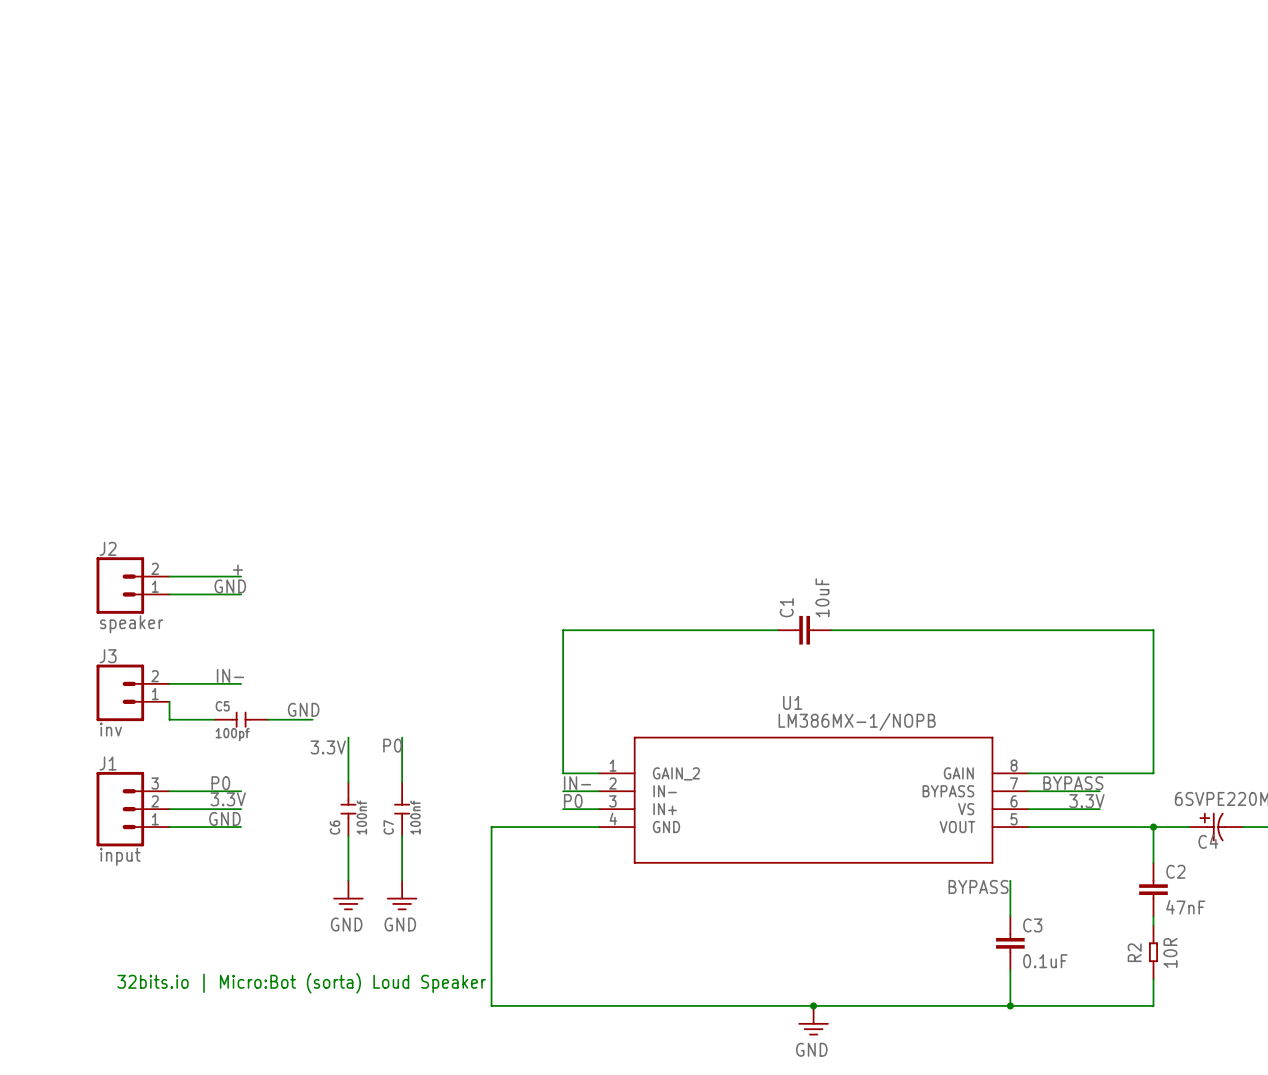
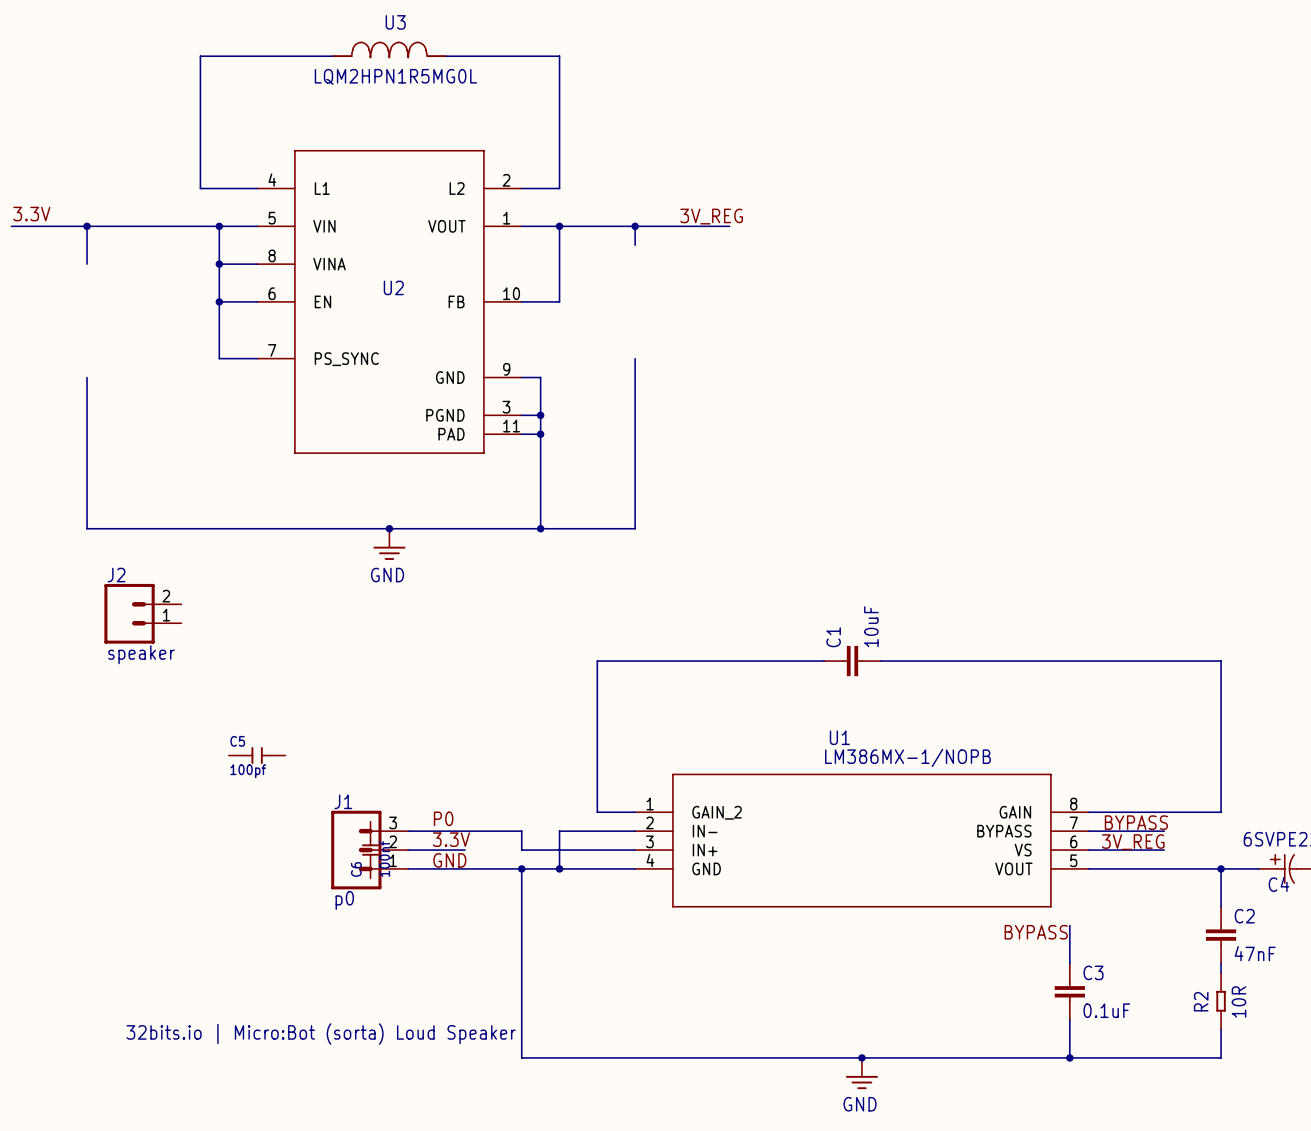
U3: none -> LQM2HPN1R5MG0L (389, 49)
wire: none -> (332, 56) (200, 56) (200, 188) (257, 188)
wire: none -> (446, 56) (559, 56) (559, 188) (521, 188)
label: none -> 3.3V (31, 214)
label: none -> 3V_REG (711, 216)
wire: none -> (11, 226) (257, 226)
wire: none -> (87, 226) (87, 264)
junction: none -> (87, 226)
wire: none -> (219, 226) (219, 358) (257, 358)
junction: none -> (219, 226)
wire: none -> (521, 226) (729, 226)
wire: none -> (559, 226) (559, 301) (521, 301)
junction: none -> (559, 226)
wire: none -> (635, 226) (635, 245)
junction: none -> (635, 226)
wire: none -> (219, 264) (257, 264)
junction: none -> (219, 264)
wire: none -> (219, 301) (257, 301)
junction: none -> (219, 301)
U2: none -> (389, 301)
wire: none -> (635, 358) (635, 528) (87, 528) (87, 377)
wire: none -> (521, 377) (540, 377) (540, 528)
wire: none -> (521, 415) (540, 415)
junction: none -> (540, 415)
wire: none -> (521, 434) (540, 434)
junction: none -> (540, 434)
junction: none -> (389, 528)
junction: none -> (540, 528)
power symbol: none -> GND (389, 544)
label: + (237, 570) -> none
wire: (169, 576) (241, 576) -> none
label: GND (230, 586) -> none
wire: (169, 594) (241, 594) -> none
label: IN- (230, 675) -> none
wire: (169, 683) (241, 683) -> none
J3: inv (133, 692) -> none
wire: (169, 701) (169, 719) (214, 719) -> none
label: GND (303, 709) -> none
wire: (267, 719) (312, 719) -> none
wire: (348, 737) (348, 782) -> none
wire: (402, 737) (402, 782) -> none
label position: P0 (392, 745) -> P0 (443, 818)
label: 3.3V (328, 747) -> none
label: P0 (220, 783) -> none
label: IN- (577, 783) -> none
wire: (169, 791) (241, 791) -> none
wire: none -> (408, 831) (521, 831) (521, 850) (597, 850)
wire: none -> (597, 831) (559, 831) (559, 868)
label: 3.3V (228, 799) -> none
label: none -> 3.3V (451, 839)
label: P0 (573, 801) -> none
label: none -> 3V_REG (1133, 842)
label: 3.3V (1086, 801) -> none
J1 position: (133, 809) -> (369, 850)
wire: (169, 809) (241, 809) -> none
wire: none -> (408, 850) (465, 850)
C7: 100nf (402, 809) -> none
label: GND (224, 818) -> none
label: none -> GND (449, 860)
wire: (169, 827) (241, 827) -> none
wire: none -> (408, 868) (521, 868)
junction: none -> (521, 868)
junction: none -> (559, 868)
wire: (348, 835) (348, 880) -> none
wire: (402, 835) (402, 880) -> none
J1 value: input (120, 856) -> p0 (344, 900)
power symbol: GND (348, 895) -> none
power symbol: GND (402, 895) -> none

